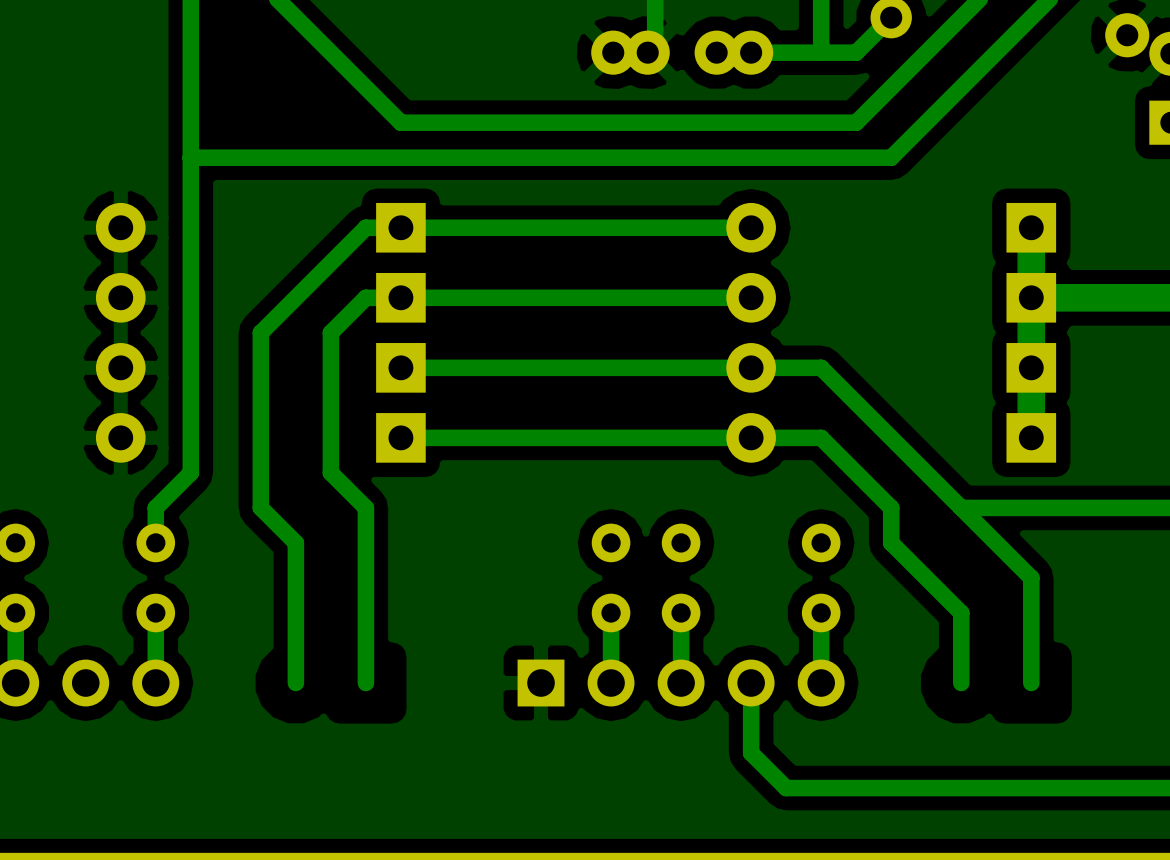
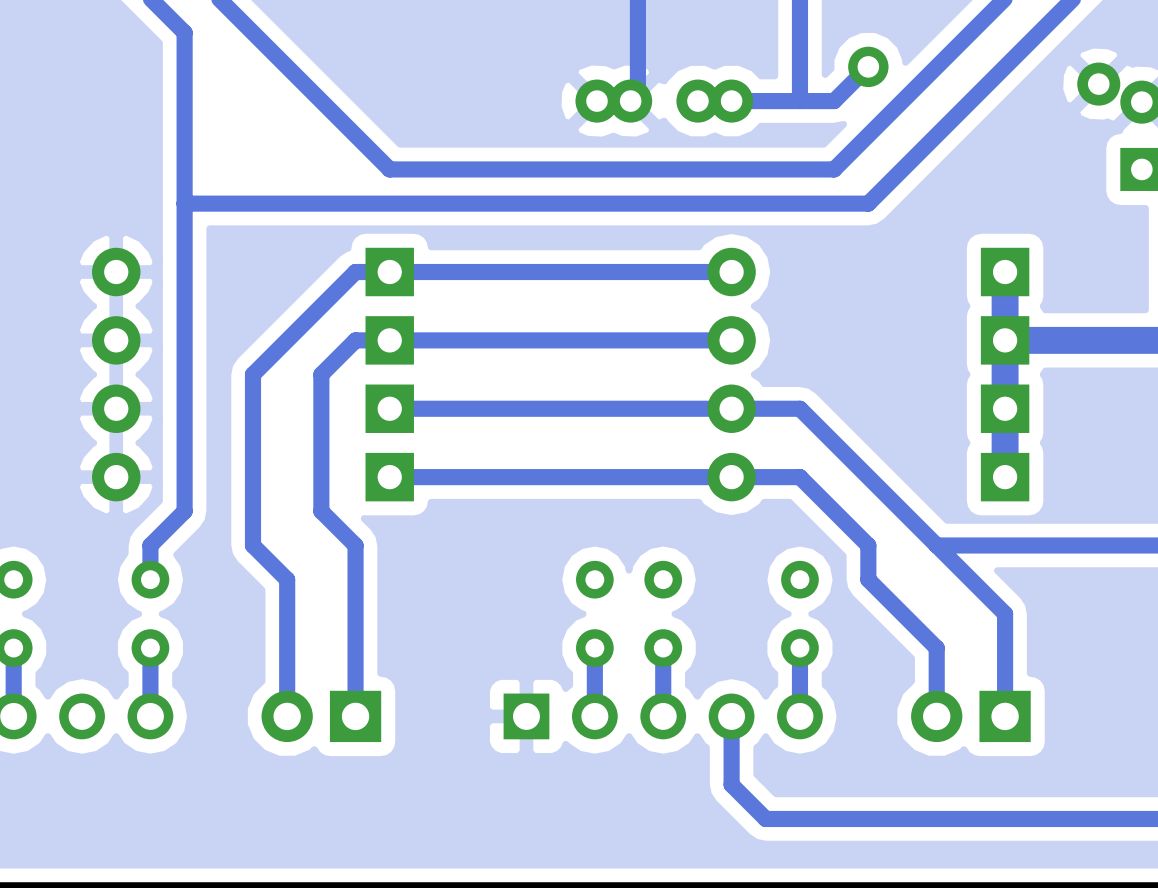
part: none -> (321, 716)
part: none -> (970, 716)

